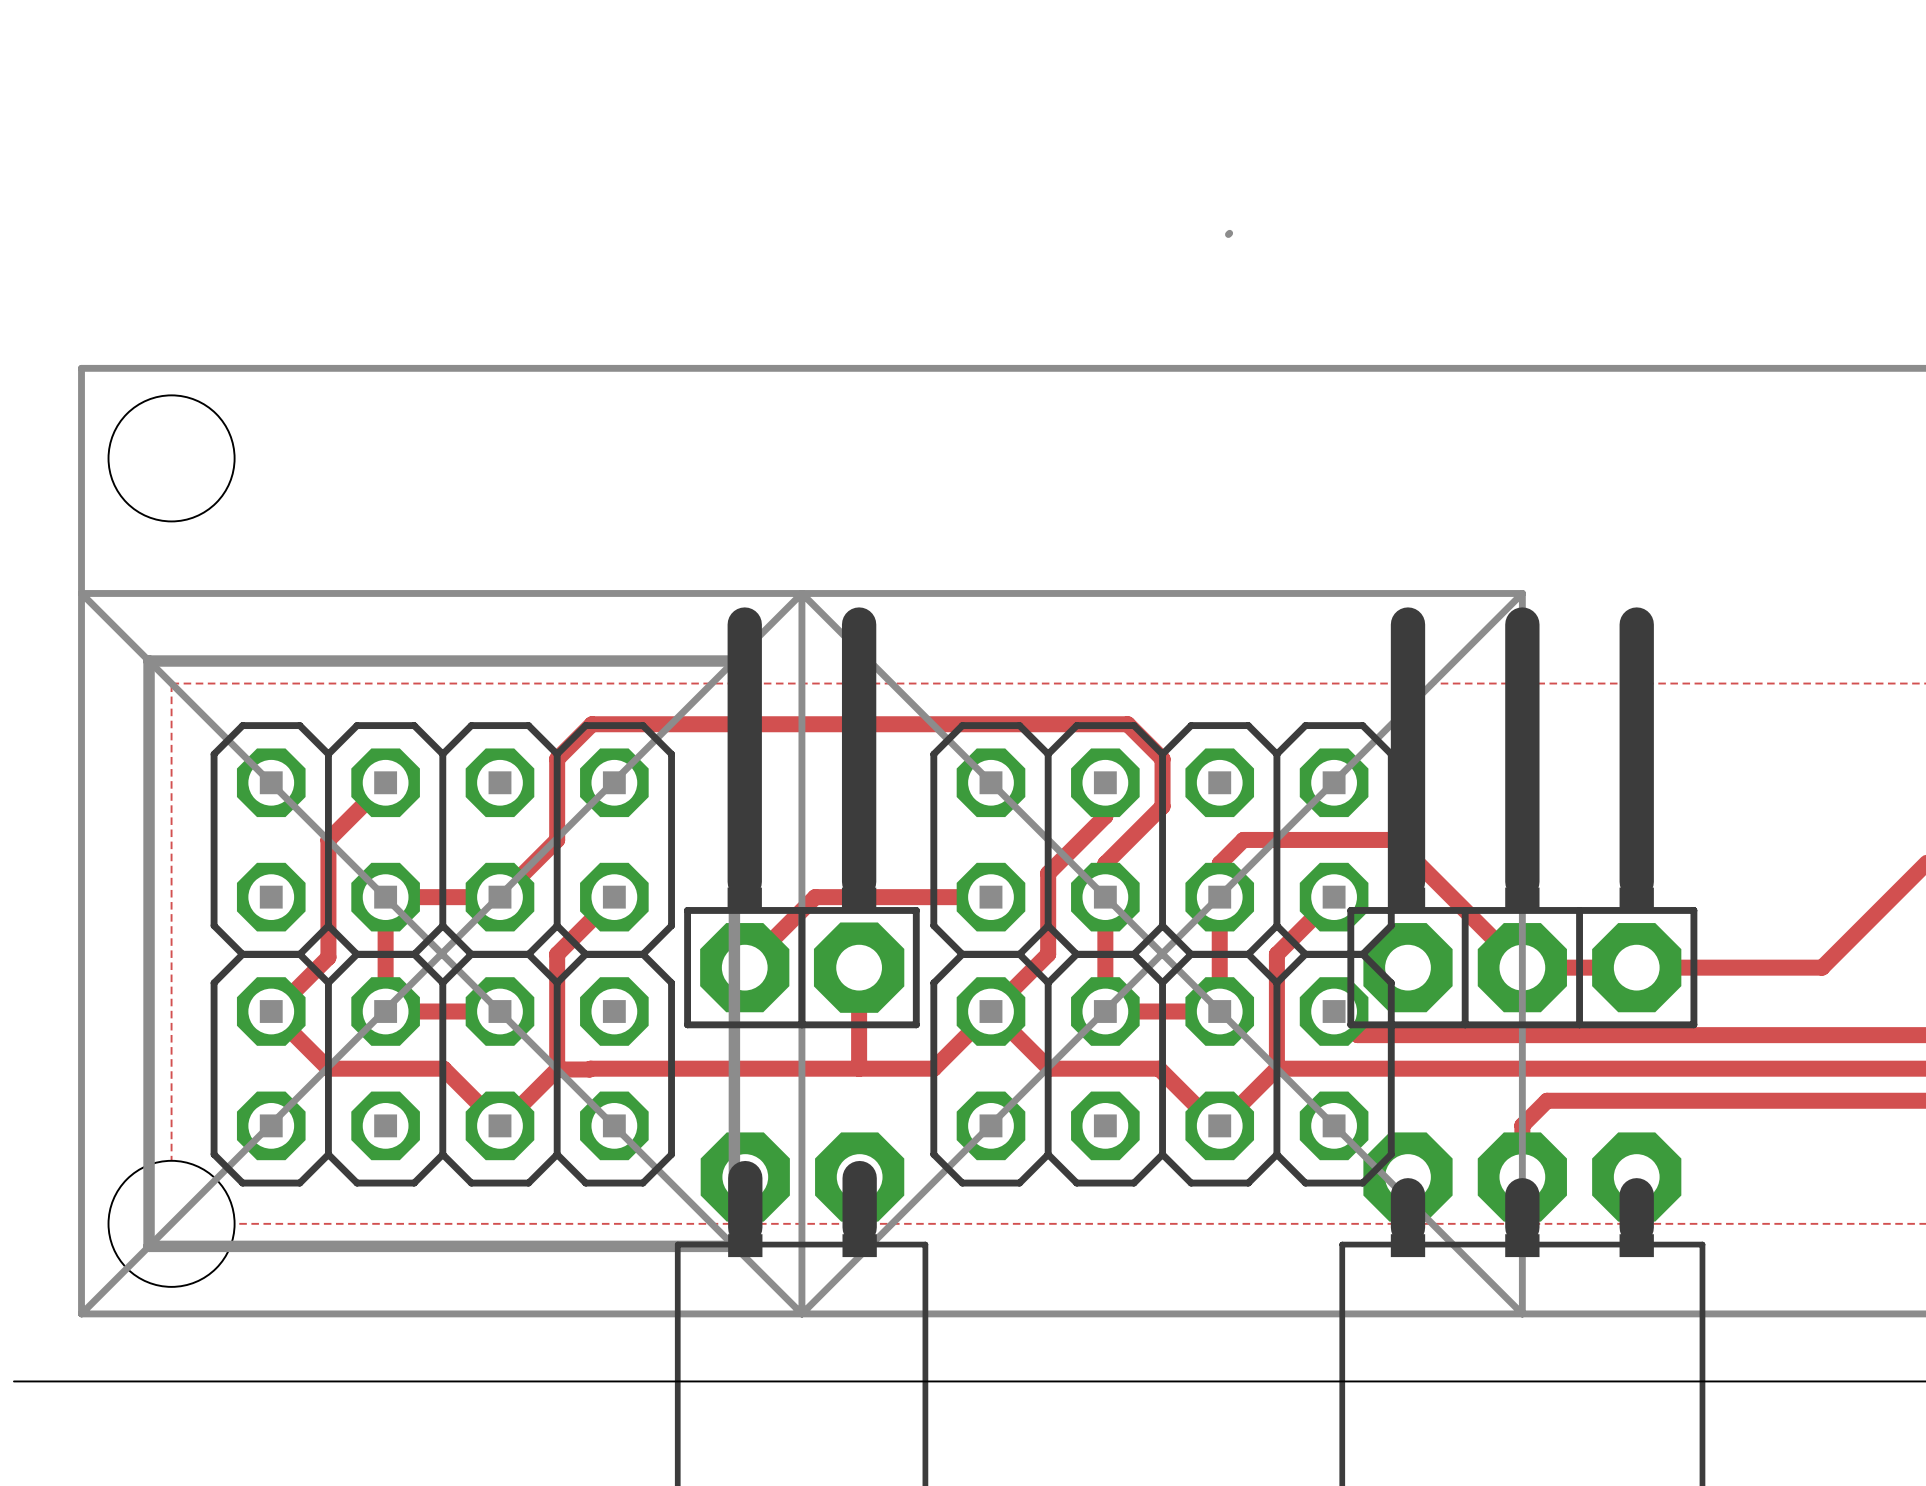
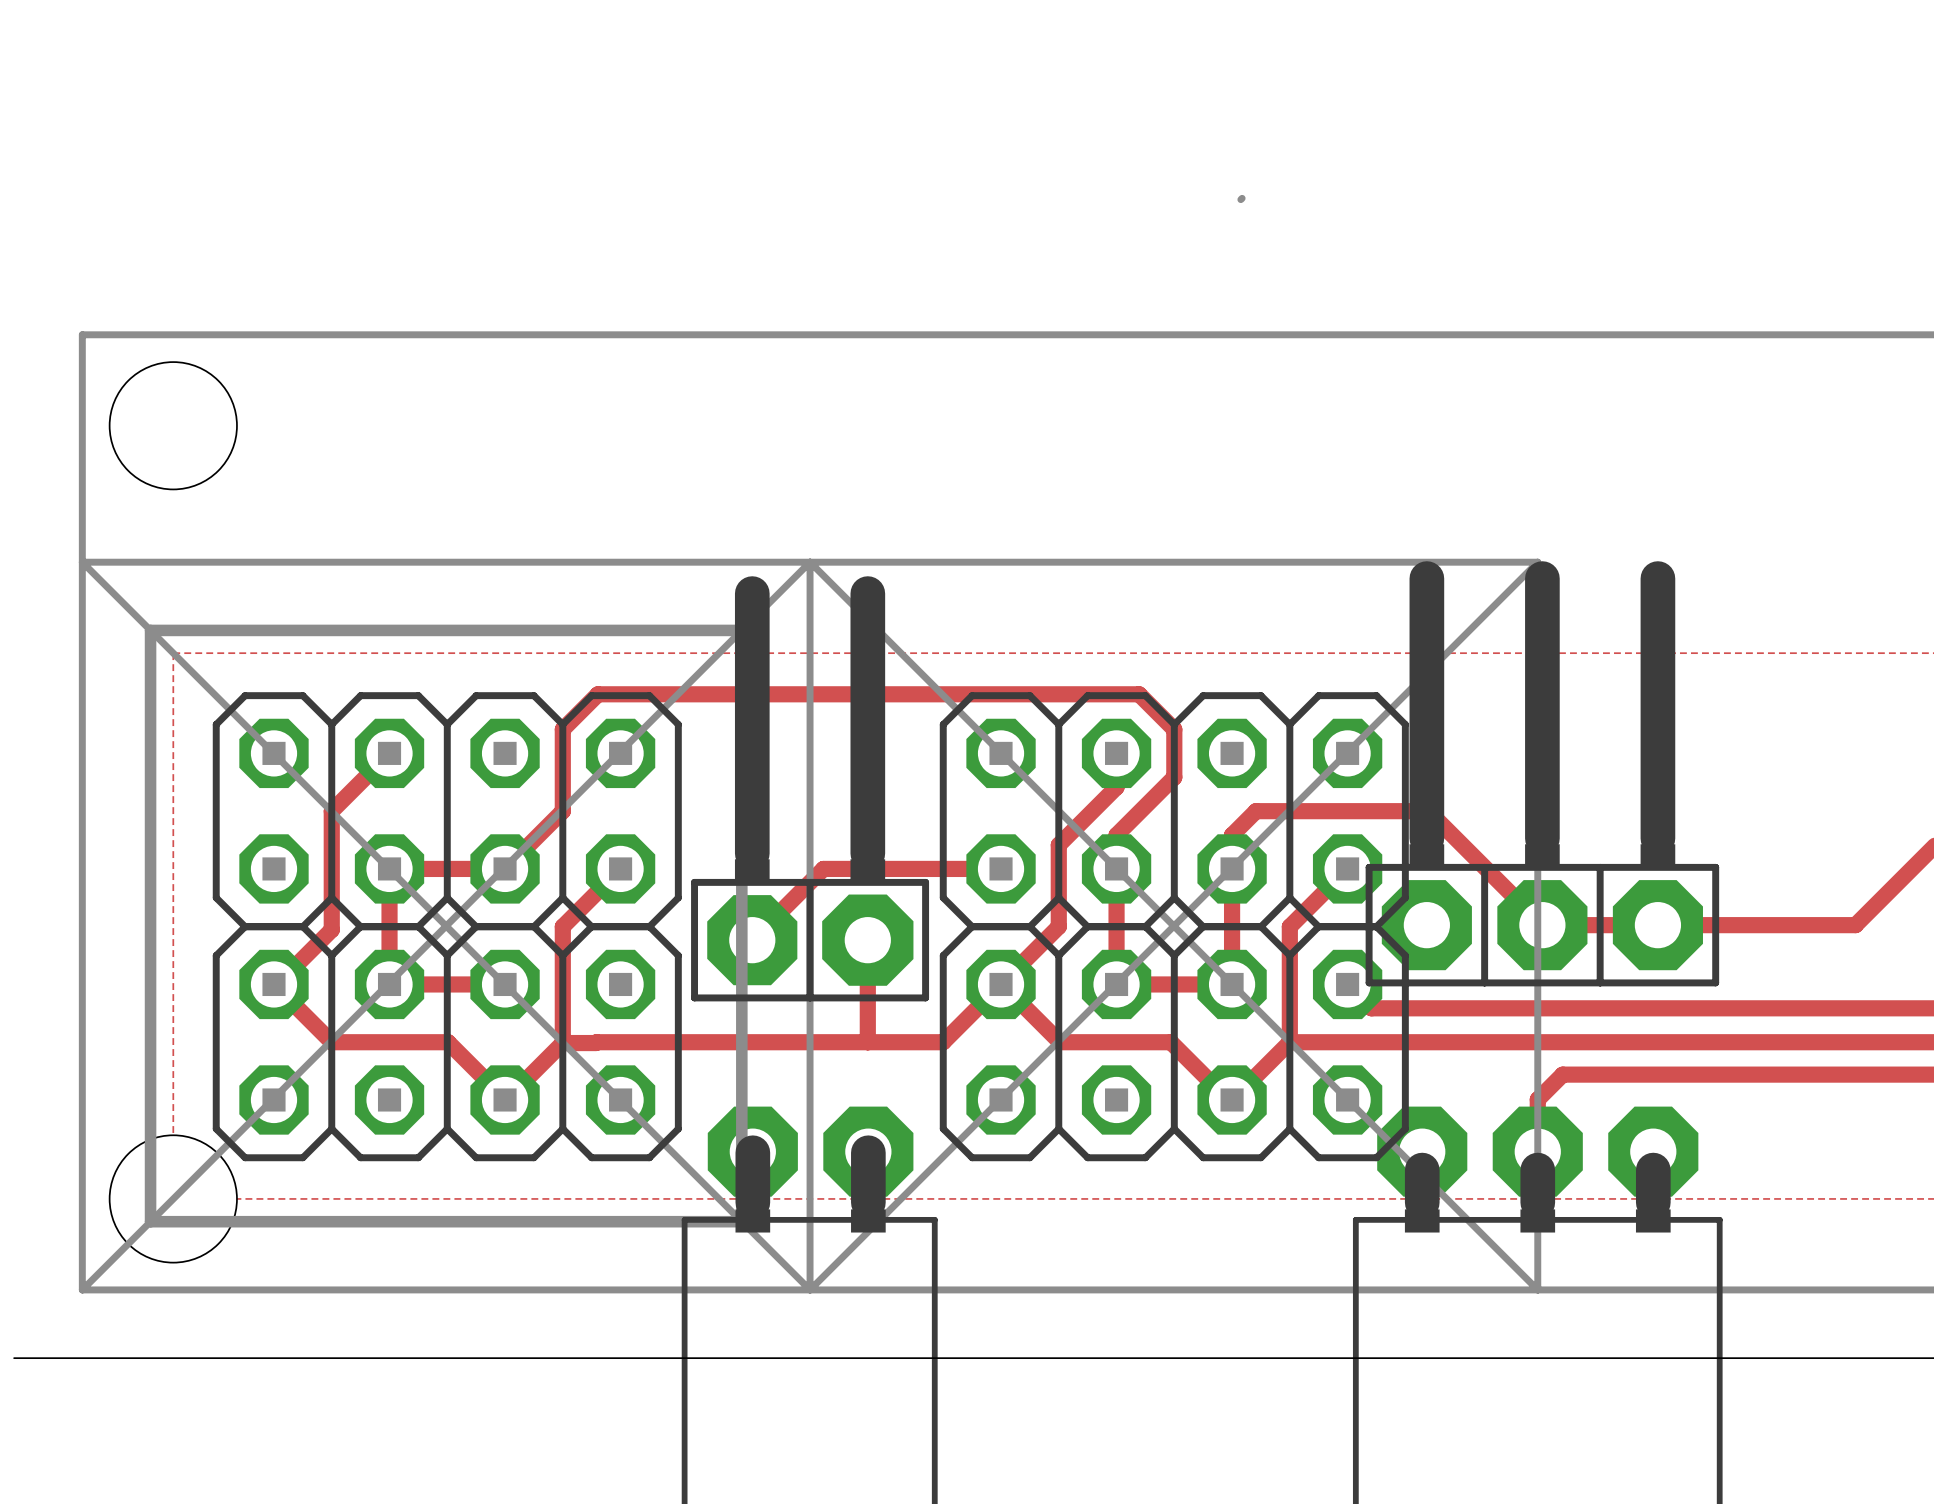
part position: (1522, 817) -> (1542, 773)
track: (1394, 839) (1522, 967) (1822, 967) (1836, 952) -> (1408, 811) (1428, 811) (1542, 925) (1855, 925)

